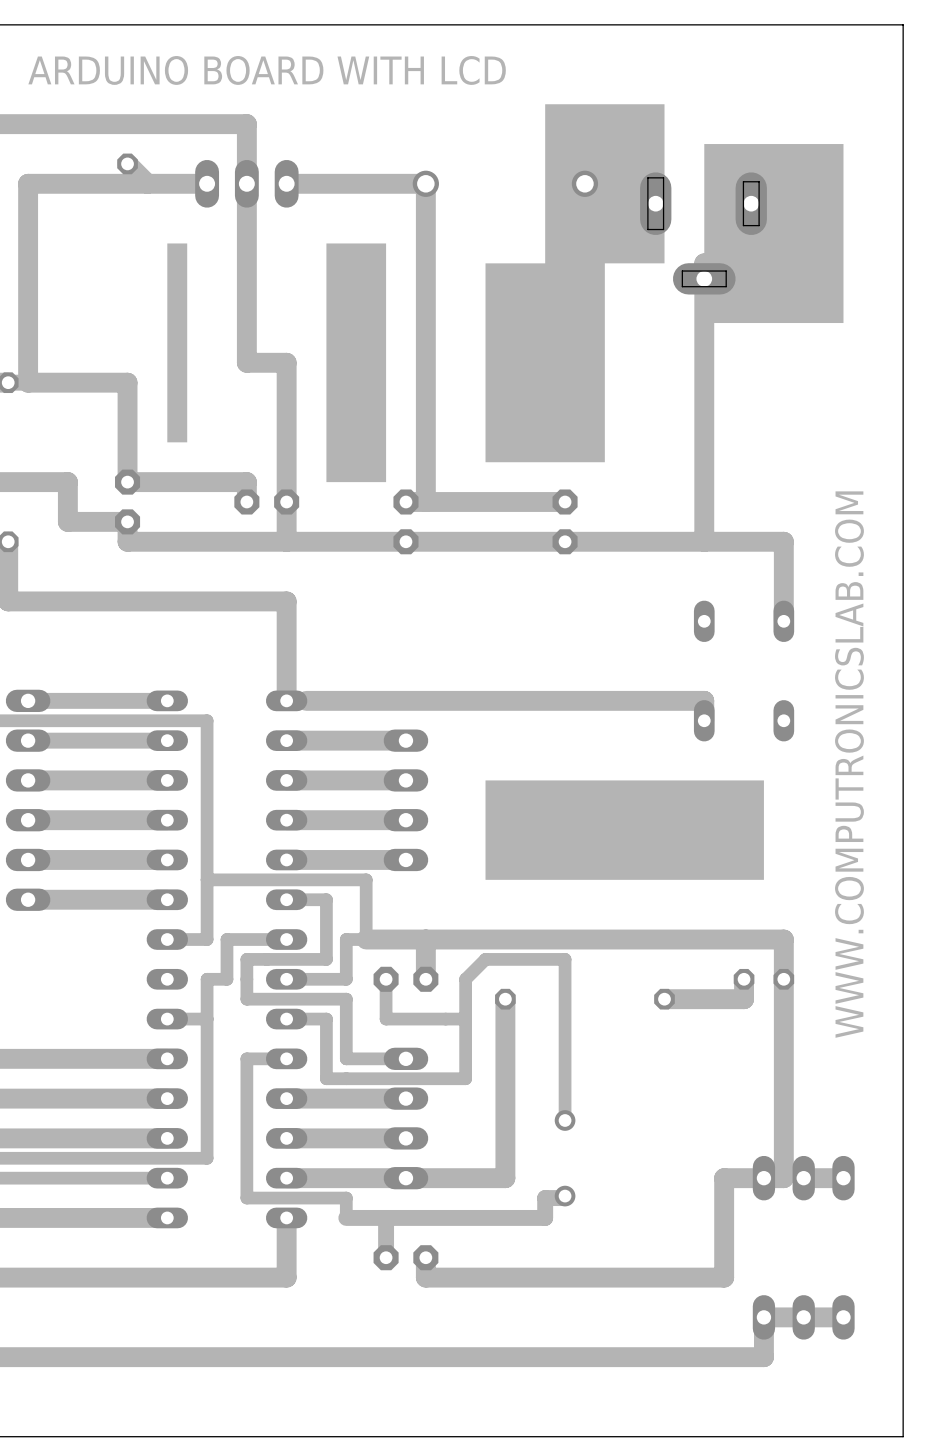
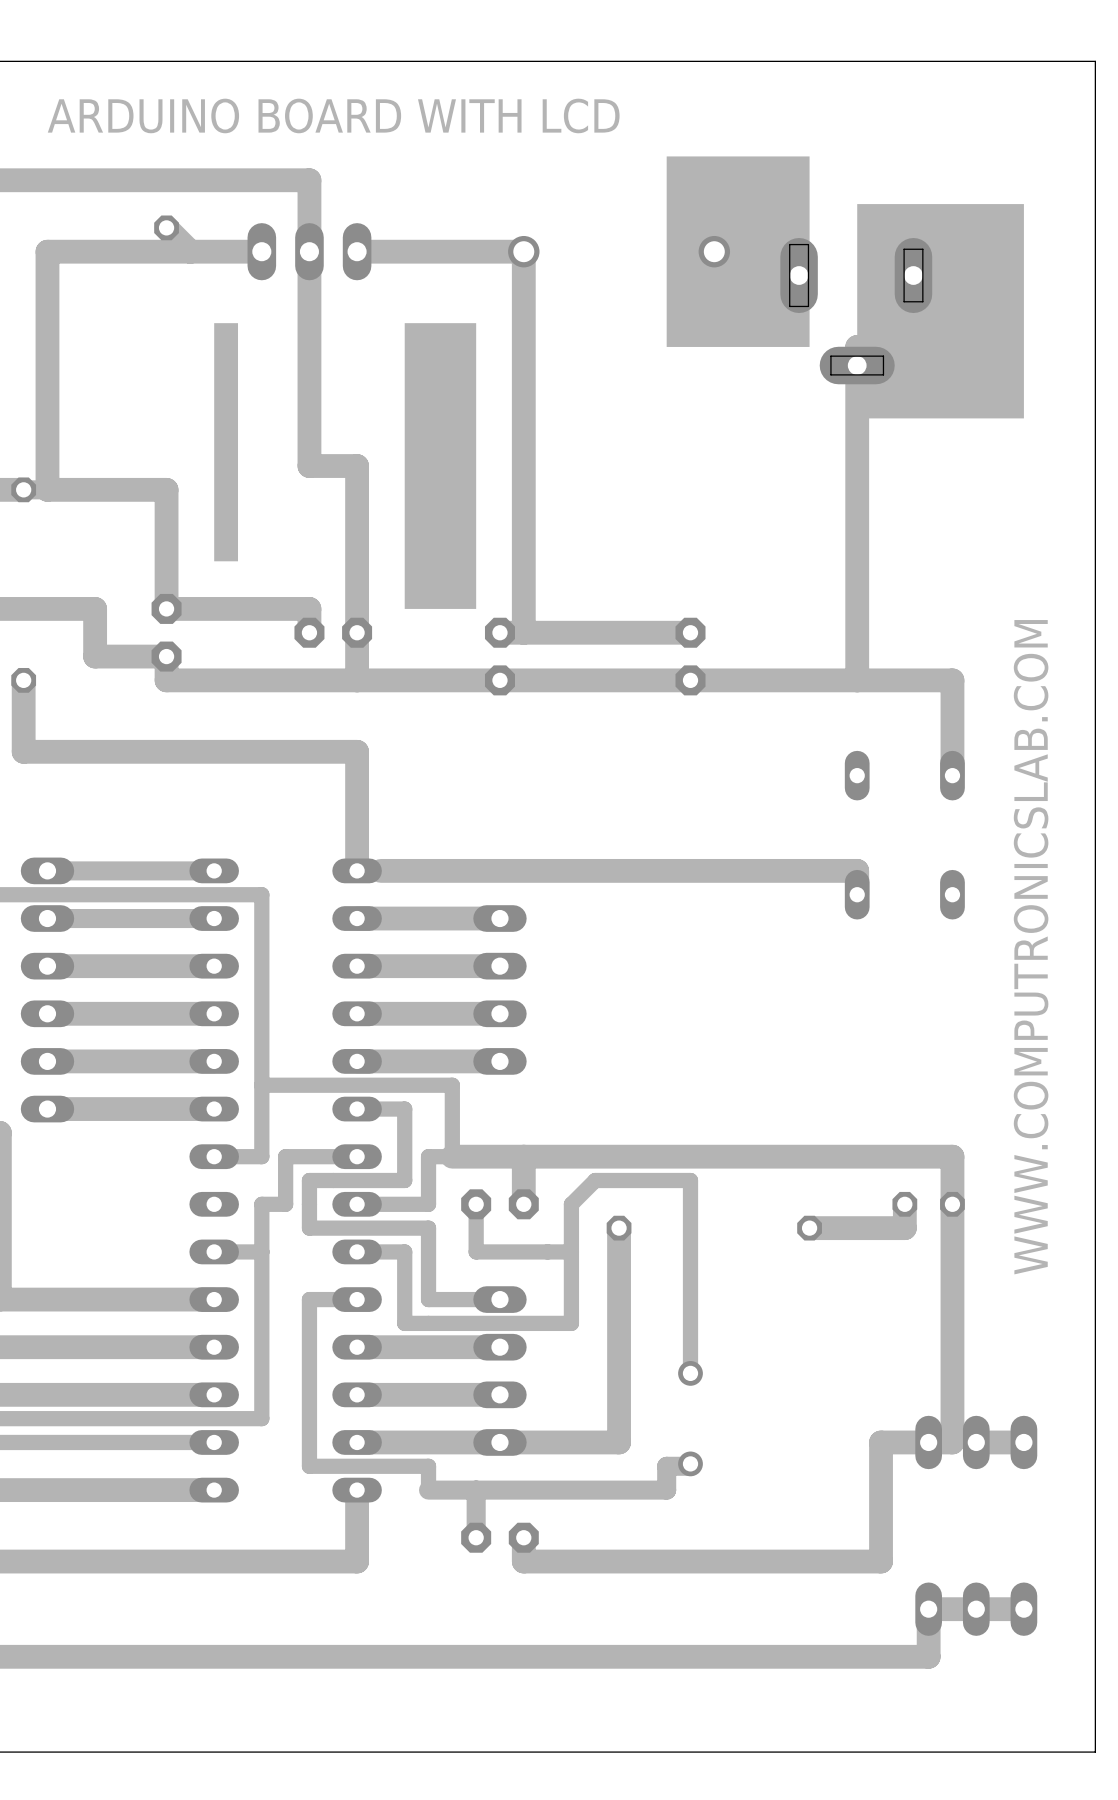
drawing: [485, 263, 605, 463] -> none
drawing: [485, 780, 764, 880] -> none

